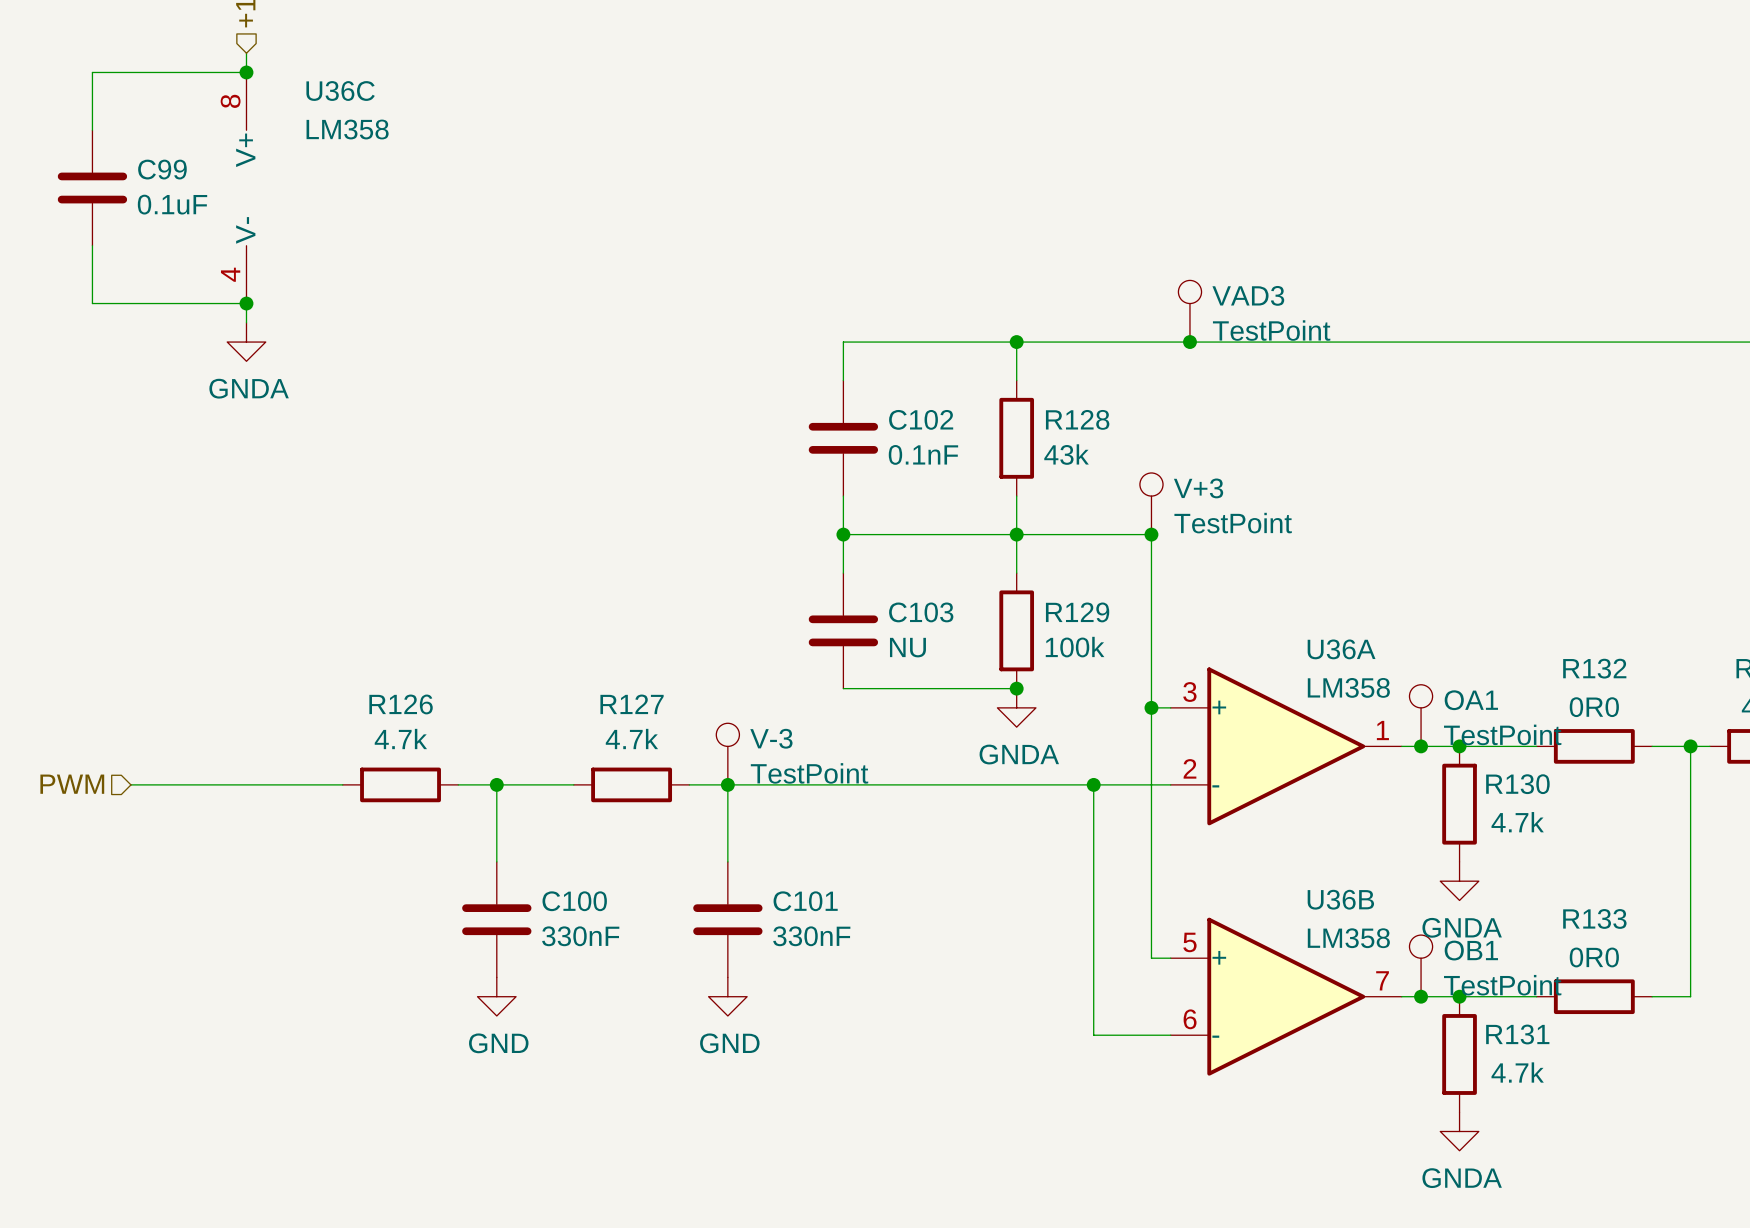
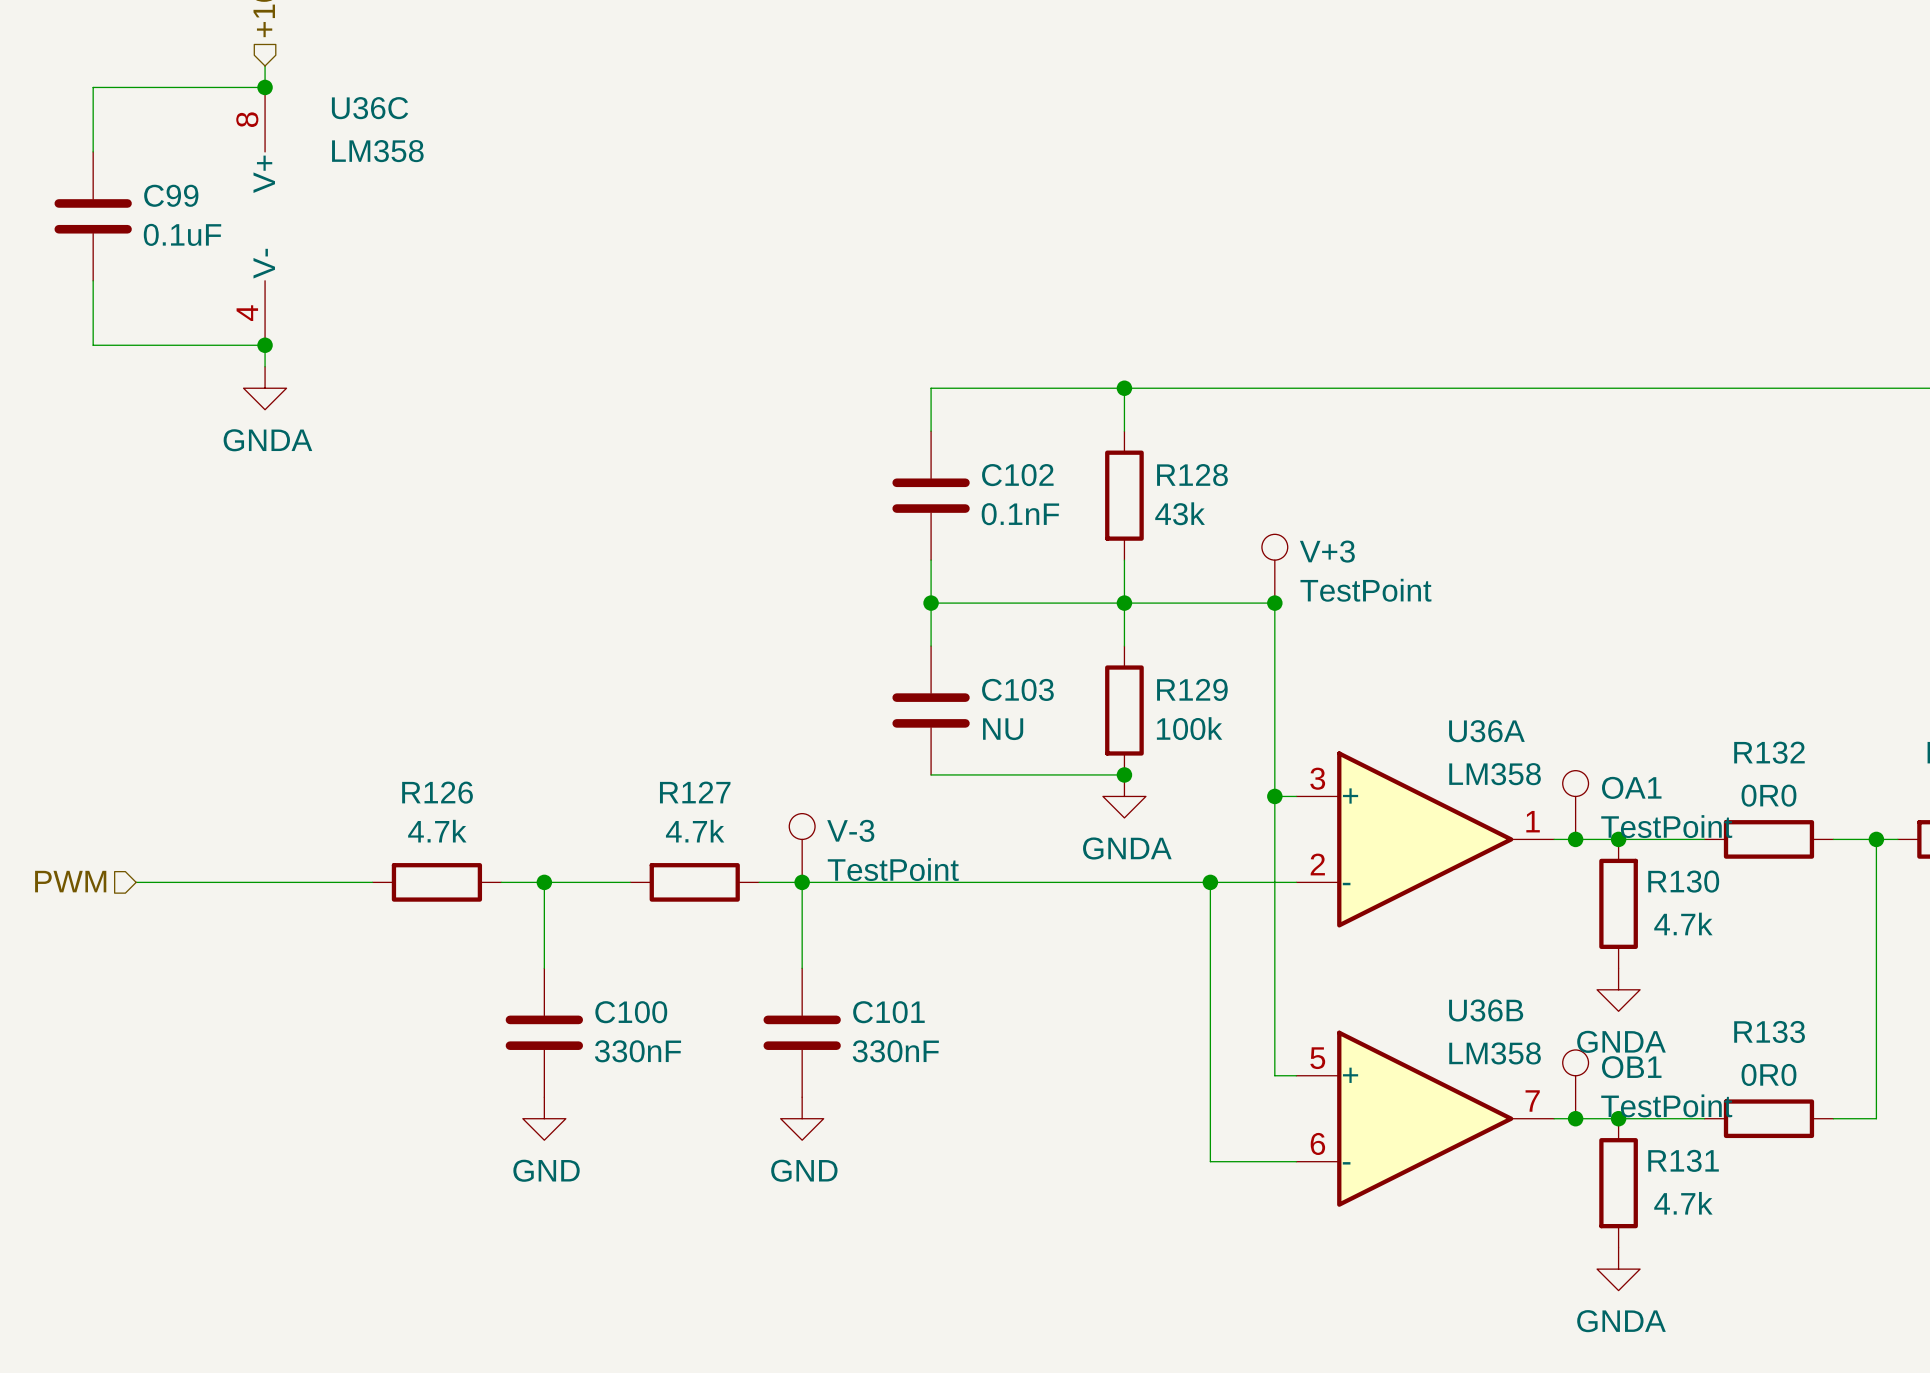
VAD3: TestPoint (1189, 311) -> none
junction: (1189, 342) -> none

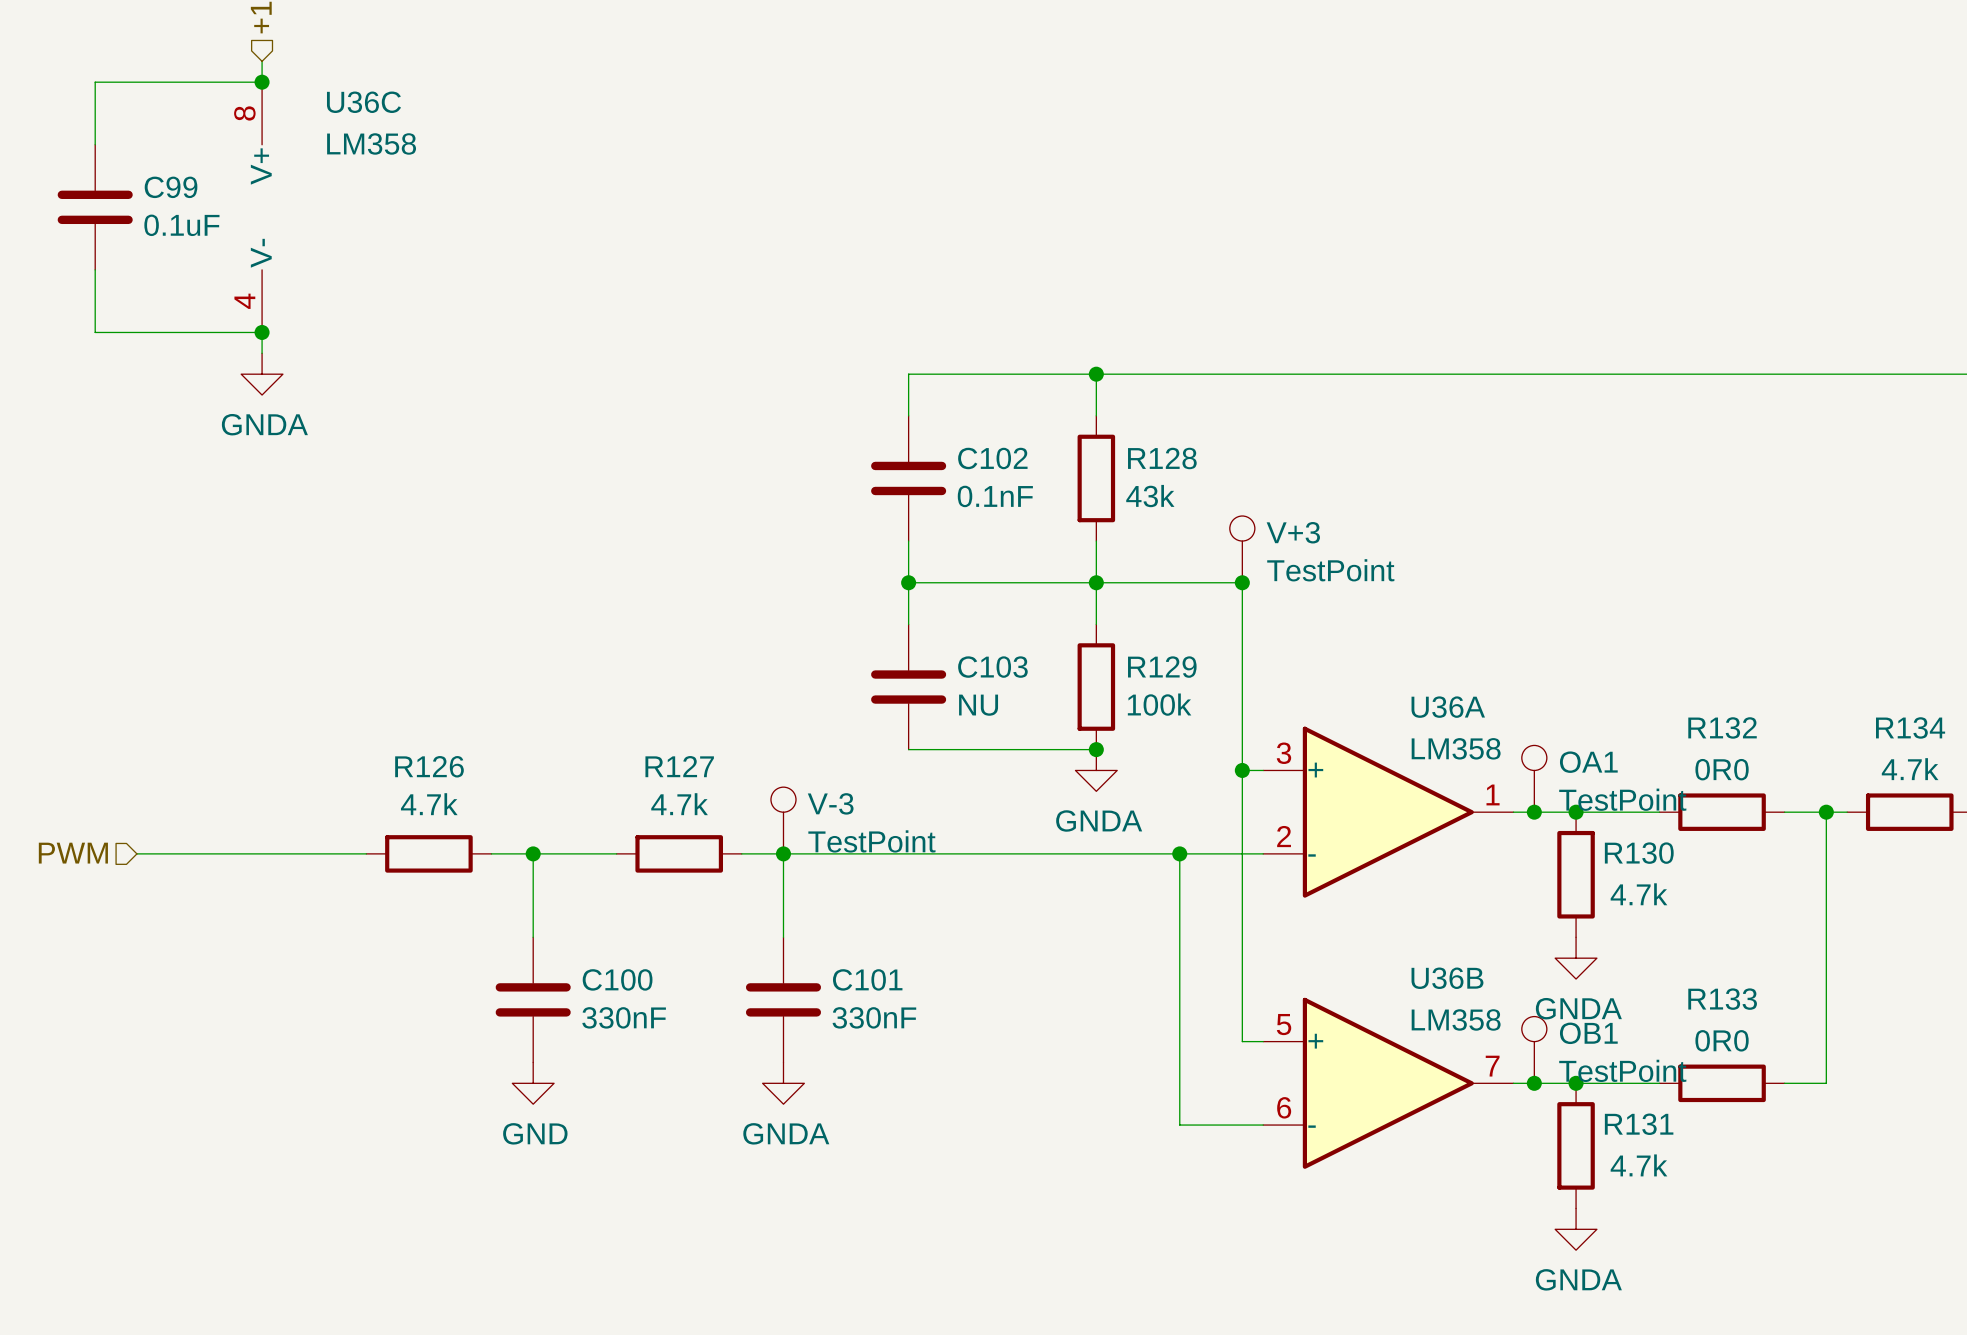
power symbol: GND (802, 1118) -> GNDA (783, 1083)

